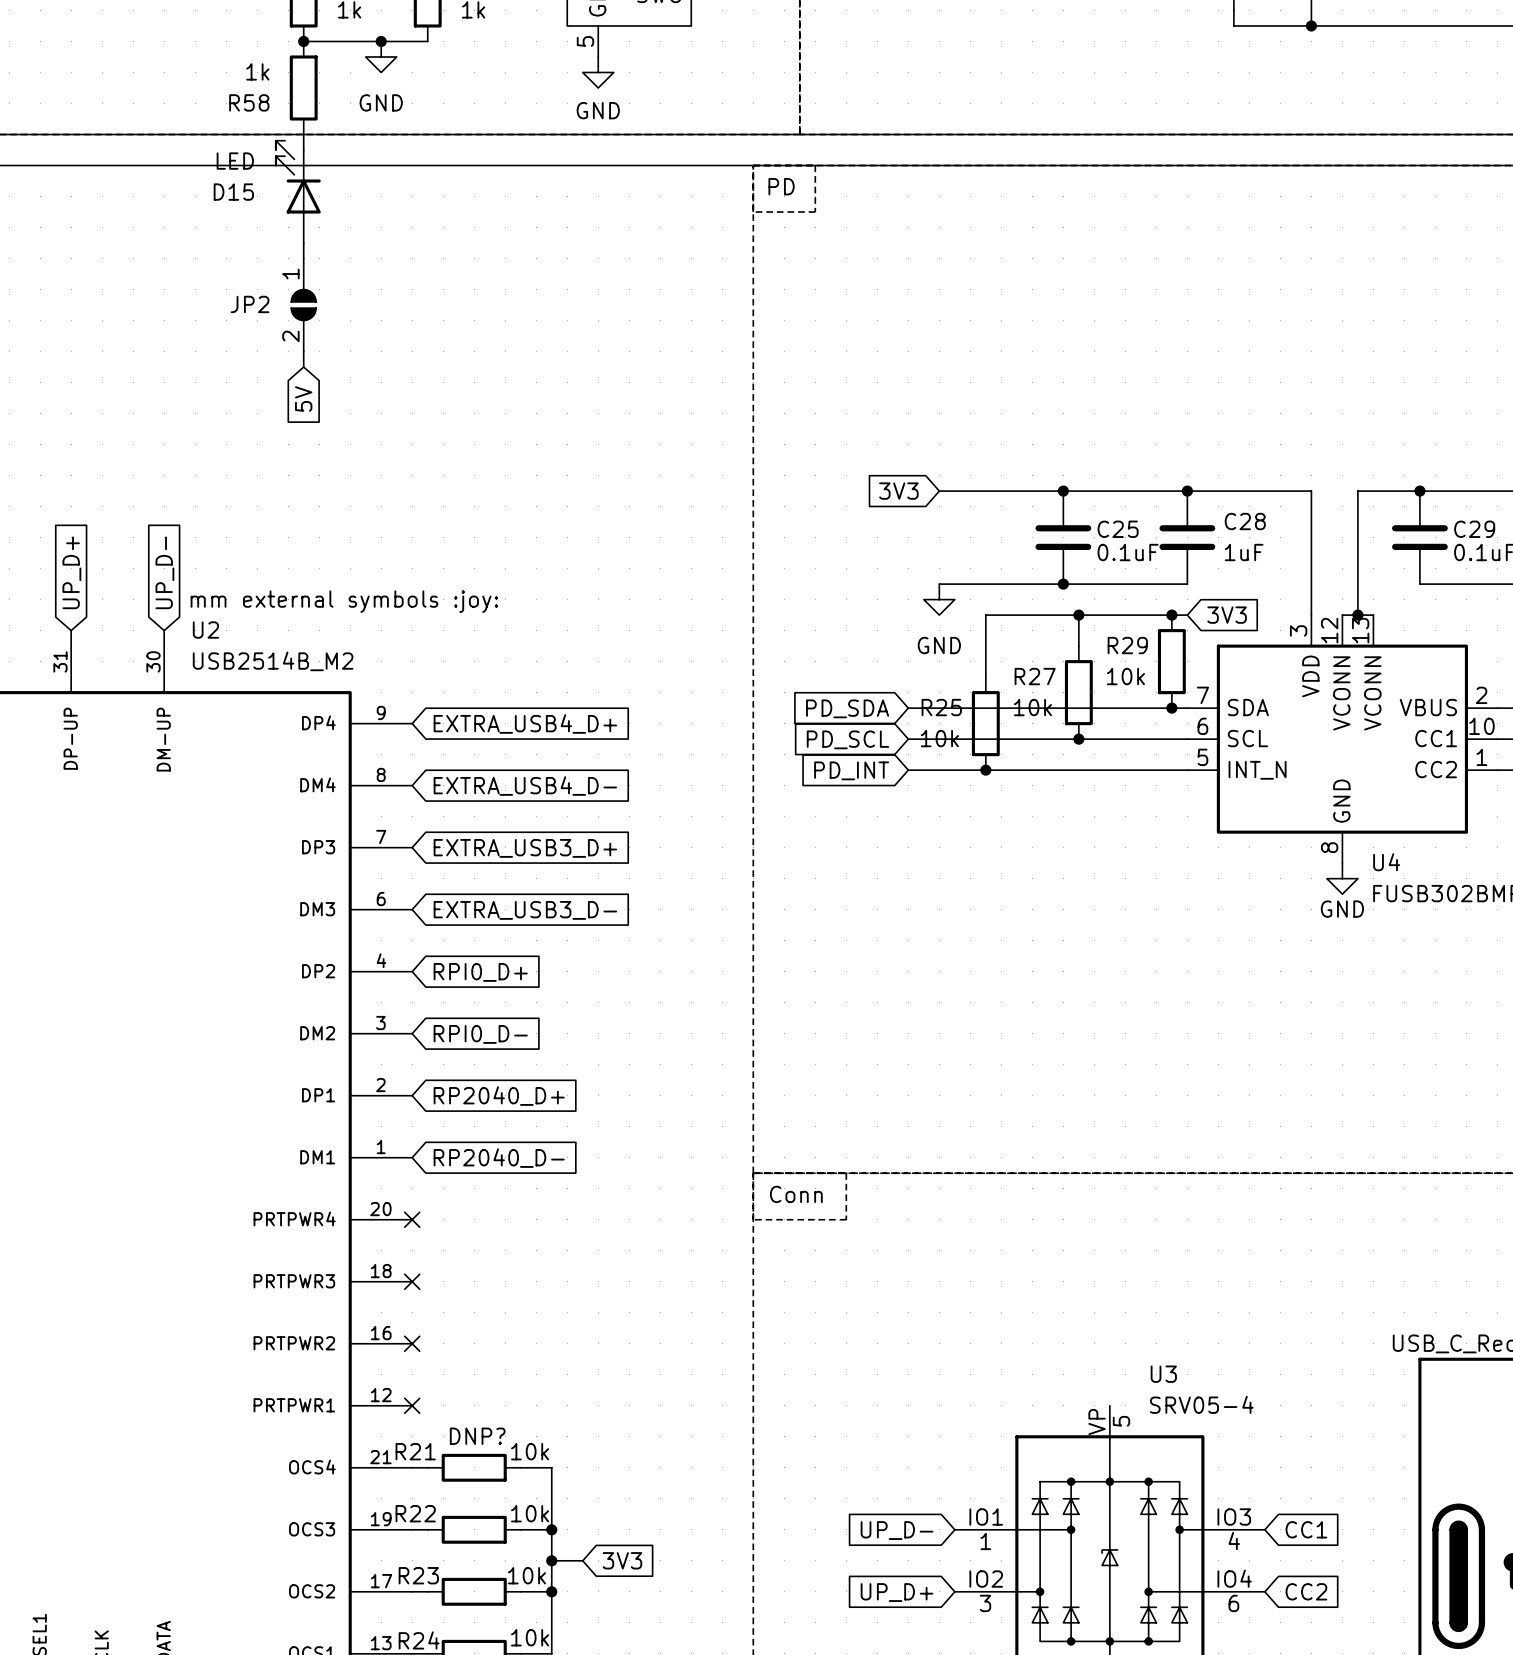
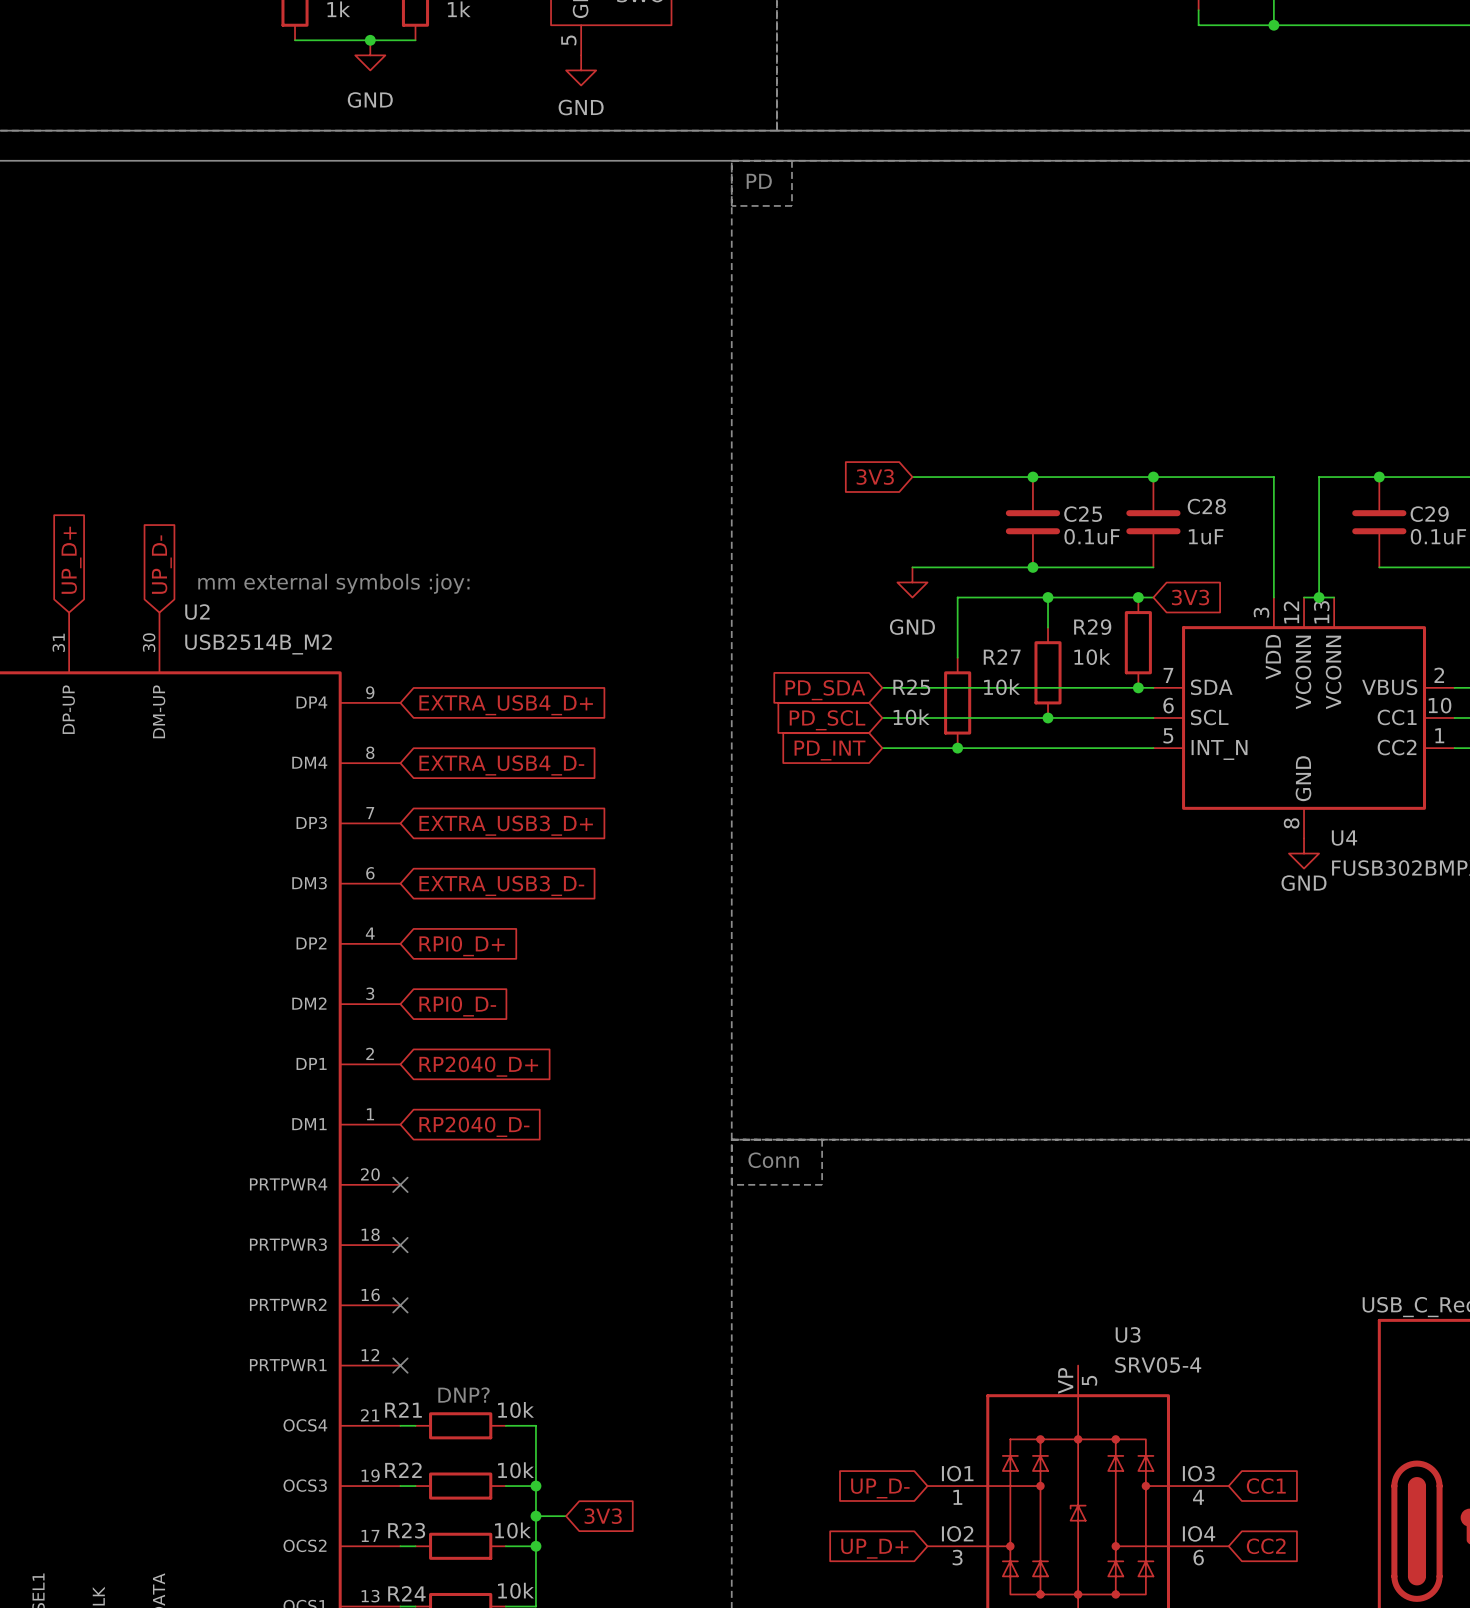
junction: (303, 41) -> none
R58: 1k (303, 87) -> none
wire: (303, 134) (303, 150) -> none
D15: LED (298, 191) -> none
wire: (303, 243) (303, 258) -> none
JP2: (303, 305) -> none
wire: (303, 351) (303, 367) -> none
global label: 5V (303, 399) -> none

